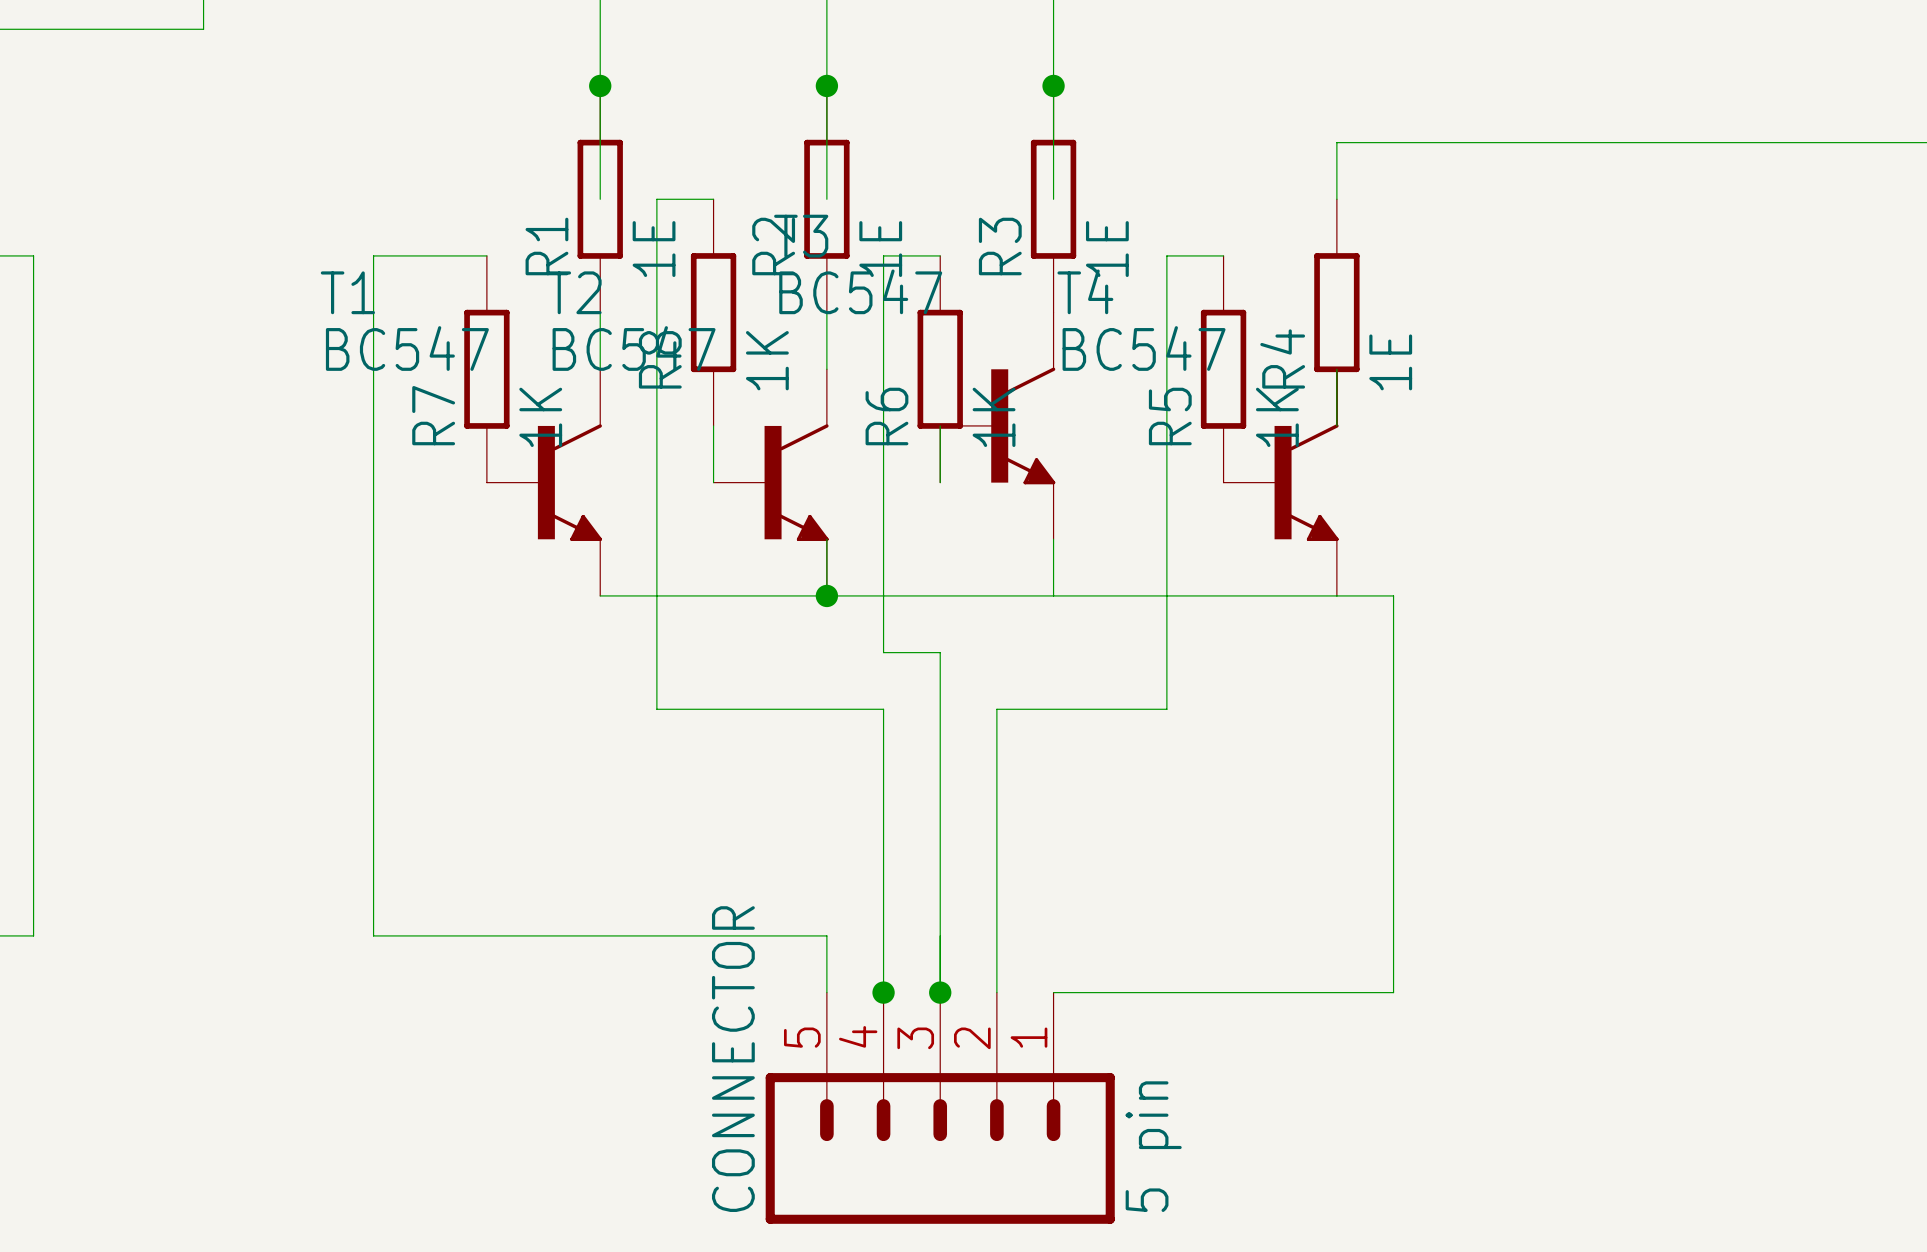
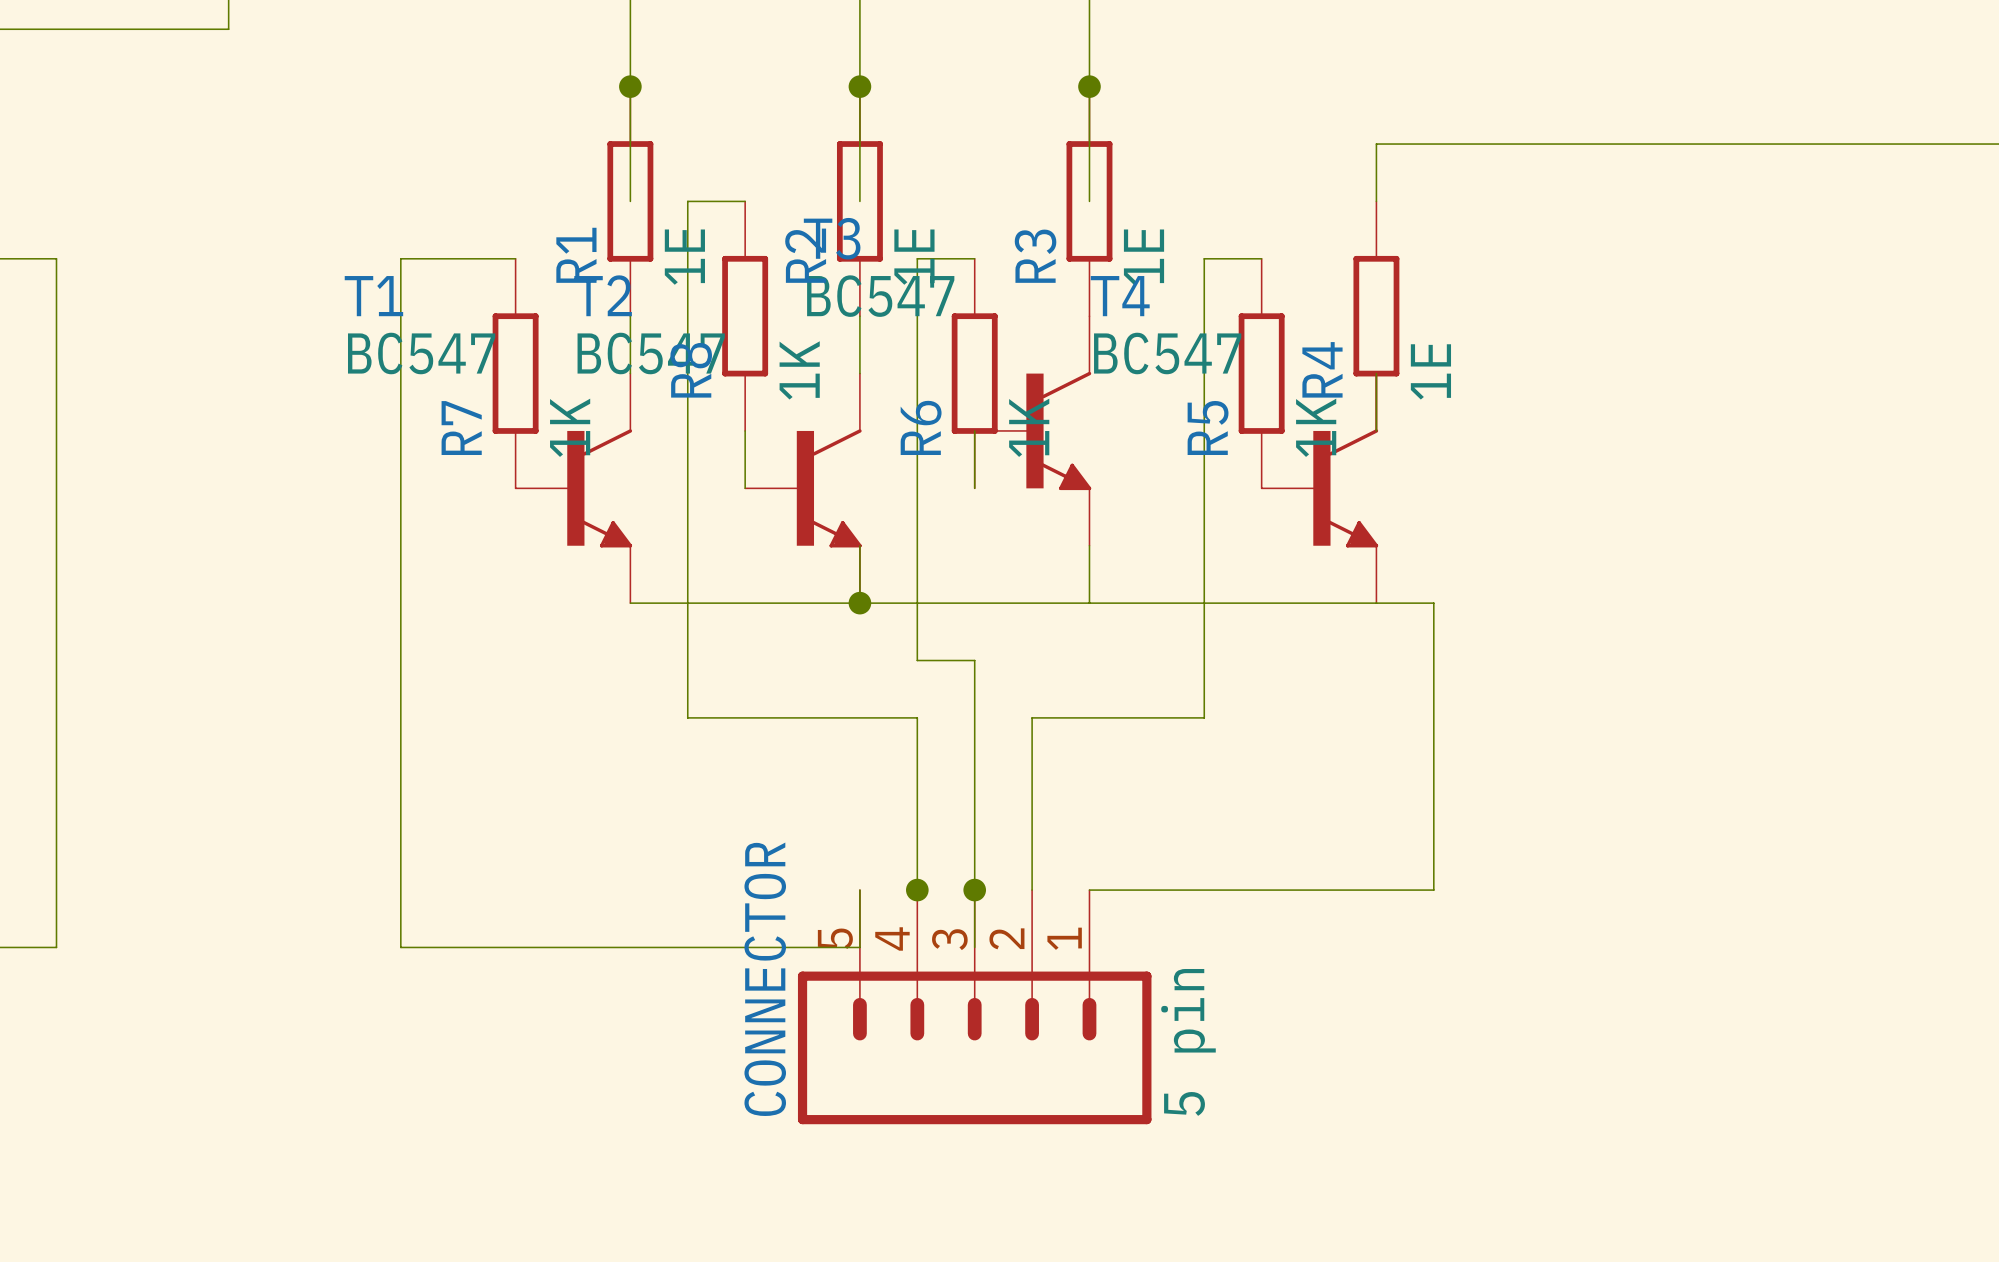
junction: none -> (917, 890)
junction: none -> (974, 890)
wire: (1393, 879) (1393, 992) (1053, 992) -> (1433, 890) (1089, 890)
junction: (883, 992) -> none
junction: (940, 992) -> none
CONNECTOR position: (940, 1108) -> (974, 1007)

